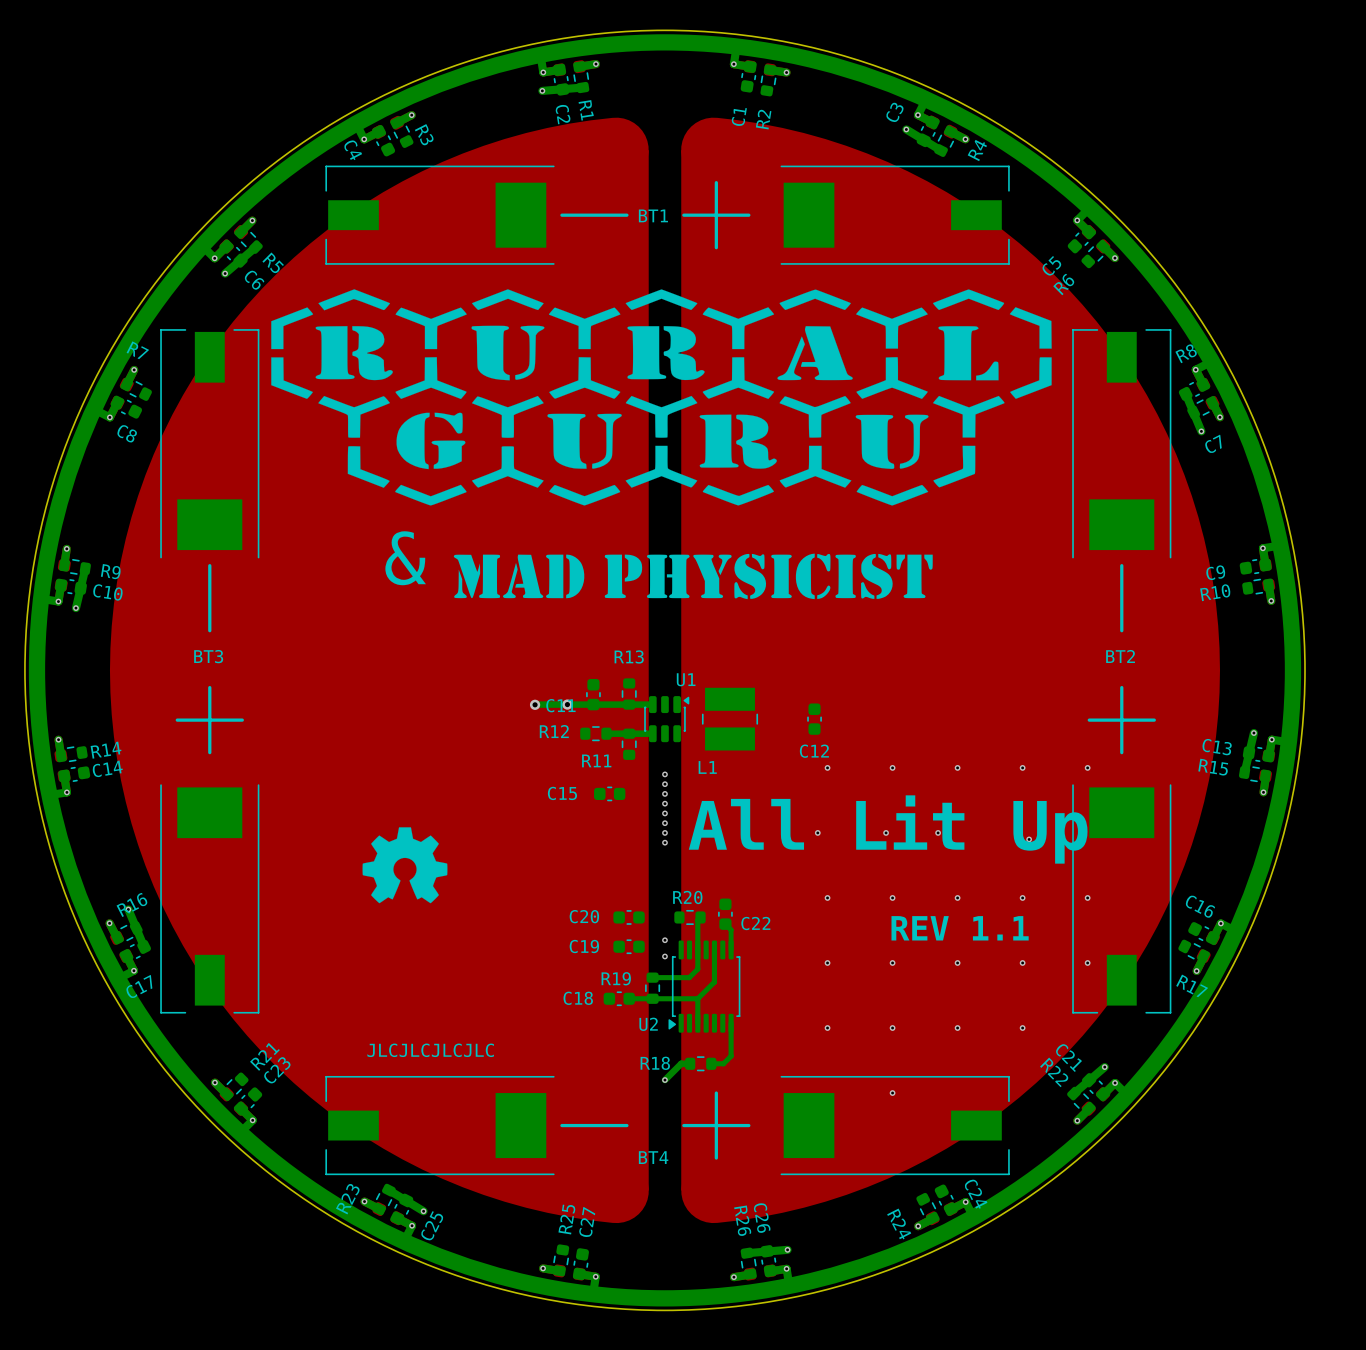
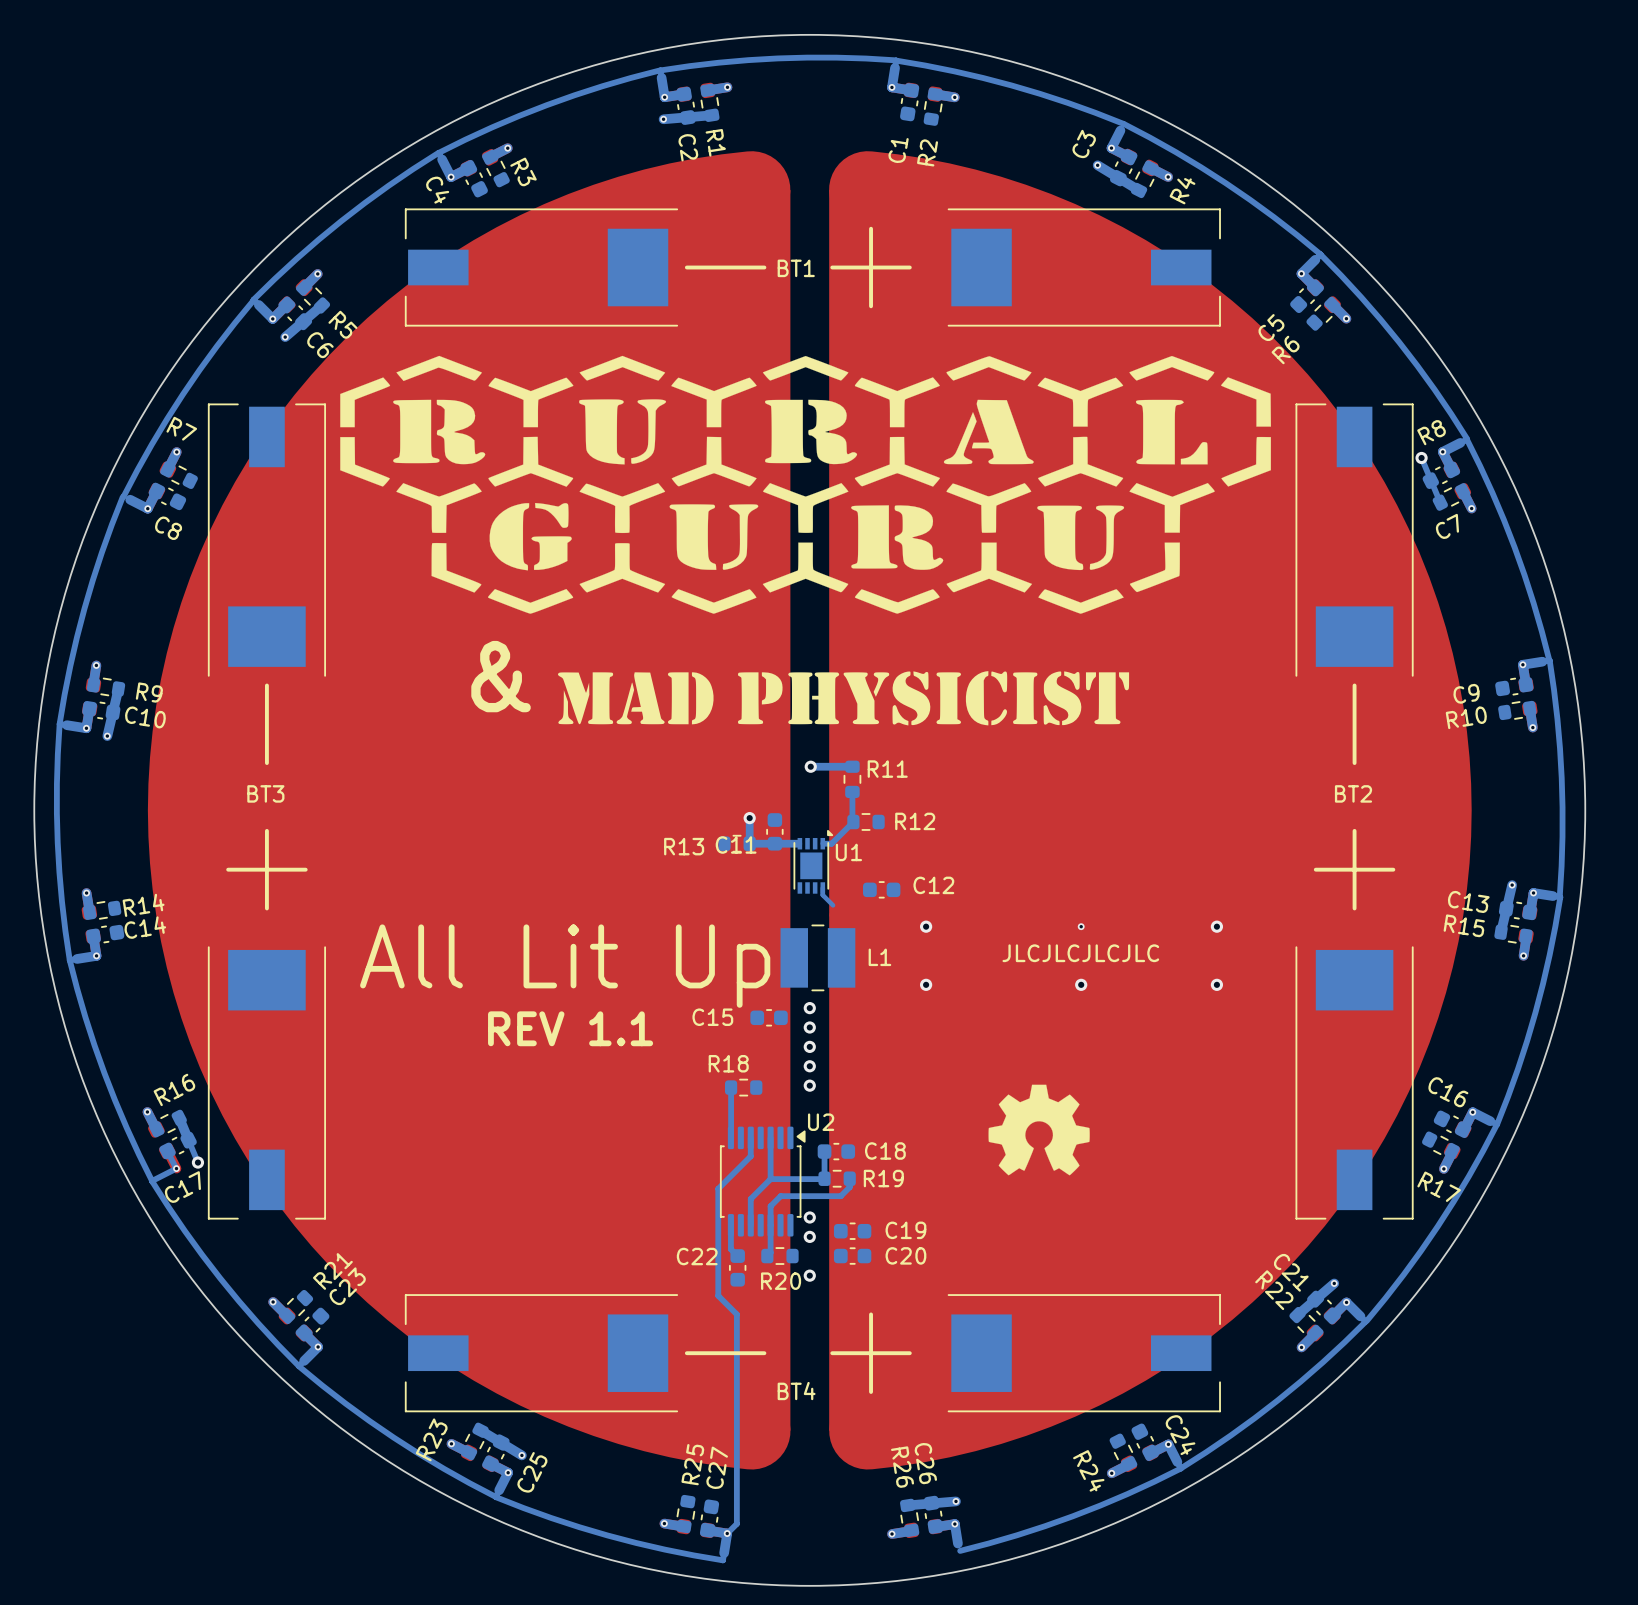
round board edge size: [24, 30, 1306, 1311] -> [33, 34, 1586, 1587]
drawing: [28, 34, 1302, 1307] -> none
bottom track: none -> (895, 60) (836, 57) (748, 60) (660, 70) (661, 77)
bottom track: none -> (895, 67) (896, 60) (982, 77) (1067, 102) (1123, 123)
bottom track: none -> (659, 70) (574, 95) (519, 115) (438, 152) (442, 159)
bottom track: none -> (1123, 123) (1175, 152) (1225, 183) (1273, 217) (1320, 254)
bottom track: none -> (437, 153) (364, 203) (318, 239) (253, 299) (258, 304)
bottom track: none -> (1315, 259) (1320, 254) (1380, 319) (1417, 365) (1467, 438)
bottom track: none -> (253, 300) (216, 346) (182, 394) (151, 444) (123, 496)
bottom track: none -> (1460, 442) (1466, 439) (1503, 519) (1533, 603) (1549, 660)
via: none -> (1421, 457)
bottom track: (1185, 393) (1201, 431) -> (1421, 457) (1440, 502)
bottom track: none -> (122, 497) (101, 552) (76, 637) (59, 724) (66, 725)
via: (1201, 431) -> none
C7 name position: C7 (1213, 444) -> C7 (1447, 526)
bottom track: none -> (1549, 660) (1557, 719) (1561, 777) (1562, 836) (1559, 895)
bottom track: none -> (59, 724) (56, 813) (59, 872) (69, 960) (77, 958)
via: none -> (810, 766)
bottom track: none -> (852, 766) (810, 766)
bottom track: none -> (852, 791) (853, 821) (831, 843) (823, 843)
R13 name position: R13 (629, 656) -> R13 (684, 846)
bottom track: none -> (749, 818) (749, 843) (798, 843)
via: none -> (749, 818)
U1 name position: U1 (686, 679) -> U1 (848, 852)
C11 position: (593, 694) -> (774, 831)
R13 rotation: 0° (629, 694) -> 90° clockwise (737, 843)
R13 position: (629, 694) -> (737, 843)
U1 footprint: [644, 696, 690, 743] -> [793, 829, 834, 894]
via: (535, 704) -> none
via: (567, 704) -> none
bottom track: (652, 704) (535, 704) -> none
L1 rotation: 0° (730, 719) -> 90° clockwise (817, 957)
L1 position: (730, 719) -> (817, 957)
C12 rotation: 0° (814, 719) -> 90° clockwise (881, 889)
C12 position: (814, 719) -> (881, 889)
R12 name position: R12 (554, 731) -> R12 (915, 821)
R12 position: (595, 733) -> (866, 821)
bottom track: (652, 733) (606, 733) -> none
bottom track: none -> (822, 887) (822, 895) (833, 905)
bottom track: none -> (1553, 896) (1560, 897) (1542, 983) (1518, 1068) (1497, 1124)
R11 position: (629, 744) -> (852, 779)
C12 name position: C12 (814, 751) -> C12 (933, 885)
R11 name position: R11 (596, 760) -> R11 (887, 769)
L1 name position: L1 (707, 767) -> L1 (879, 957)
via: none -> (926, 926)
via: (827, 767) -> none
via: (957, 767) -> none
via: none -> (1216, 926)
via: (1022, 767) -> none
via: (1087, 767) -> none
via: (664, 774) -> none
via: (664, 784) -> none
text: none -> JLCJLCJLCJLC (1080, 953)
C15 position: (609, 793) -> (769, 1017)
via: (664, 793) -> none
text: none -> All Lit Up (565, 966)
via: (664, 803) -> none
via: (664, 813) -> none
via: none -> (926, 984)
via: none -> (1081, 984)
via: none -> (1216, 984)
via: (664, 823) -> none
text: All Lit Up (888, 829) -> none
via: (664, 832) -> none
via: (817, 832) -> none
via: (886, 832) -> none
via: (938, 832) -> none
via: none -> (809, 1008)
via: (1029, 839) -> none
via: (664, 842) -> none
via: none -> (809, 1027)
text: none -> REV 1.1 (570, 1028)
via: none -> (809, 1046)
via: none -> (809, 1066)
R20 name position: R20 (687, 897) -> R20 (781, 1281)
via: (827, 897) -> none
via: (892, 897) -> none
via: (957, 897) -> none
via: (1022, 897) -> none
via: (1087, 897) -> none
drawing: none -> [988, 1084, 1090, 1176]
via: none -> (809, 1085)
bottom track: none -> (731, 1087) (731, 1137)
bottom track: (128, 909) (136, 928) -> (188, 1140) (197, 1162)
via: (128, 909) -> none
C22 position: (725, 914) -> (737, 1267)
C20 name position: C20 (584, 916) -> C20 (905, 1255)
C20 position: (629, 917) -> (852, 1256)
R20 position: (689, 917) -> (779, 1256)
bottom track: (700, 917) (697, 920) (697, 969) (689, 977) (652, 977) -> none
C22 name position: C22 (755, 923) -> C22 (697, 1256)
bottom track: (725, 924) (731, 929) (731, 949) -> none
text: REV 1.1 (960, 928) -> none
bottom track: none -> (1490, 1121) (1496, 1124) (1453, 1201) (1421, 1250) (1366, 1320)
via: (664, 940) -> none
bottom track: none -> (750, 1137) (750, 1156) (718, 1188) (718, 1295) (736, 1314) (736, 1523) (727, 1533)
bottom track: none -> (770, 1137) (770, 1179)
C19 name position: C19 (584, 946) -> C19 (905, 1230)
C19 position: (629, 946) -> (852, 1231)
bottom track: (714, 949) (714, 982) (697, 998) -> none
bottom track: (126, 956) (133, 970) (119, 978) -> (167, 1151) (176, 1168) (152, 1180) (126, 1127) (104, 1073) (85, 1017) (69, 960)
via: (664, 956) -> none
bottom track: none -> (824, 1151) (824, 1179) (770, 1179)
via: (827, 962) -> none
via: (892, 962) -> none
via: (957, 962) -> none
via: (1022, 962) -> none
via: (1087, 962) -> none
via: none -> (197, 1162)
R19 name position: R19 (616, 978) -> R19 (883, 1178)
bottom track: none -> (770, 1179) (750, 1198) (750, 1225)
bottom track: none -> (849, 1178) (849, 1187) (840, 1196) (780, 1196) (770, 1206) (770, 1252) (767, 1256)
bottom track: none -> (152, 1181) (202, 1254) (238, 1301) (298, 1366) (304, 1360)
U2 rotation: 0° (704, 986) -> 180° (762, 1181)
U2 position: (704, 986) -> (762, 1181)
R19 rotation: 0° (652, 988) -> 90° clockwise (837, 1178)
R19 position: (652, 988) -> (837, 1178)
C18 name position: C18 (578, 998) -> C18 (885, 1151)
C18 position: (619, 998) -> (836, 1151)
bottom track: (697, 998) (629, 998) -> none
bottom track: (697, 998) (697, 1023) -> none
via: none -> (809, 1217)
bottom track: none -> (730, 1225) (730, 1249) (737, 1256)
bottom track: (731, 1023) (731, 1056) (723, 1063) (711, 1063) -> none
via: none -> (809, 1236)
via: (827, 1028) -> none
via: (892, 1028) -> none
via: (957, 1028) -> none
via: (1022, 1028) -> none
text: JLCJLCJLCJLC (430, 1050) -> none
via: none -> (809, 1275)
R18 name position: R18 (655, 1063) -> R18 (728, 1063)
bottom track: (690, 1063) (681, 1063) (664, 1080) -> none
R18 position: (700, 1063) -> (743, 1087)
via: (664, 1080) -> none
via: (892, 1093) -> none
bottom track: none -> (1360, 1316) (1365, 1321) (1300, 1381) (1230, 1435) (1181, 1468)
bottom track: none -> (299, 1366) (345, 1403) (418, 1453) (495, 1496) (499, 1490)
bottom track: none -> (1177, 1462) (1180, 1468) (1100, 1505) (1017, 1535) (960, 1550)
bottom track: none -> (496, 1497) (551, 1518) (636, 1542) (722, 1560) (724, 1553)

